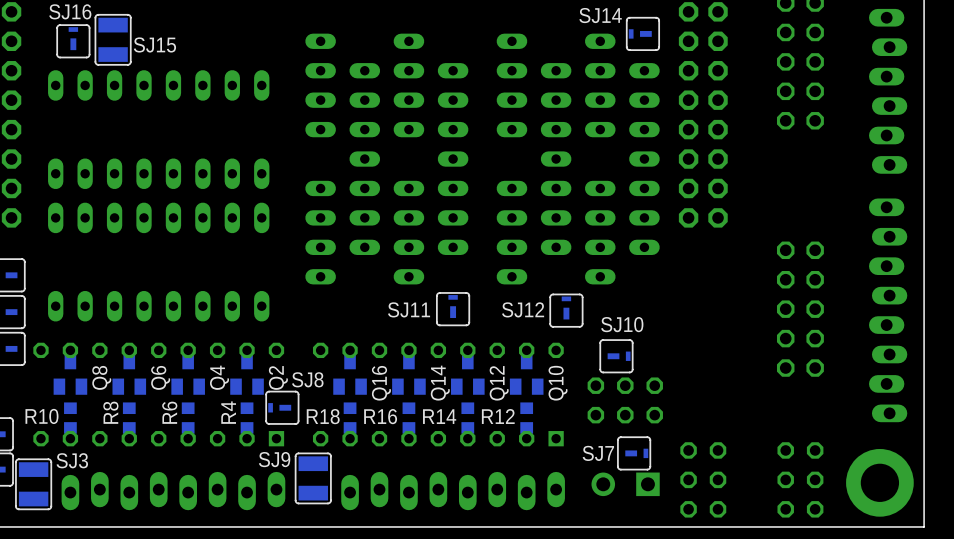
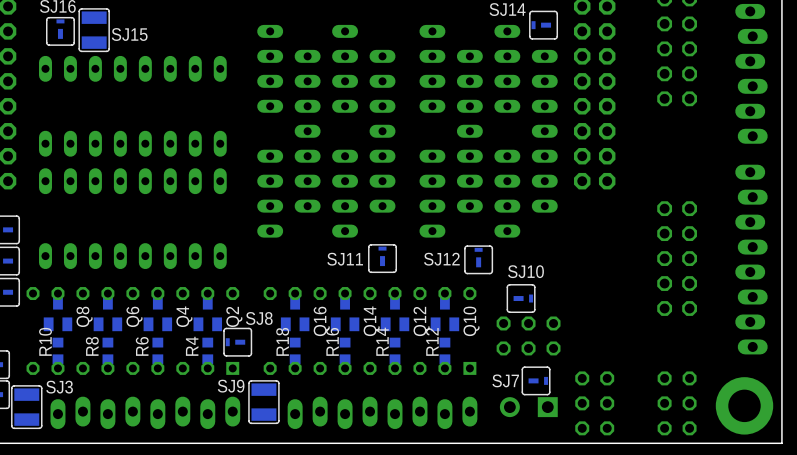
R10 name rotation: 0° (41, 416) -> 90° counterclockwise (45, 341)
R18 name rotation: 0° (323, 416) -> 90° counterclockwise (282, 341)
R16 name rotation: 0° (380, 416) -> 90° counterclockwise (332, 341)
R14 name rotation: 0° (439, 416) -> 90° counterclockwise (382, 341)
R12 name rotation: 0° (498, 416) -> 90° counterclockwise (432, 341)

